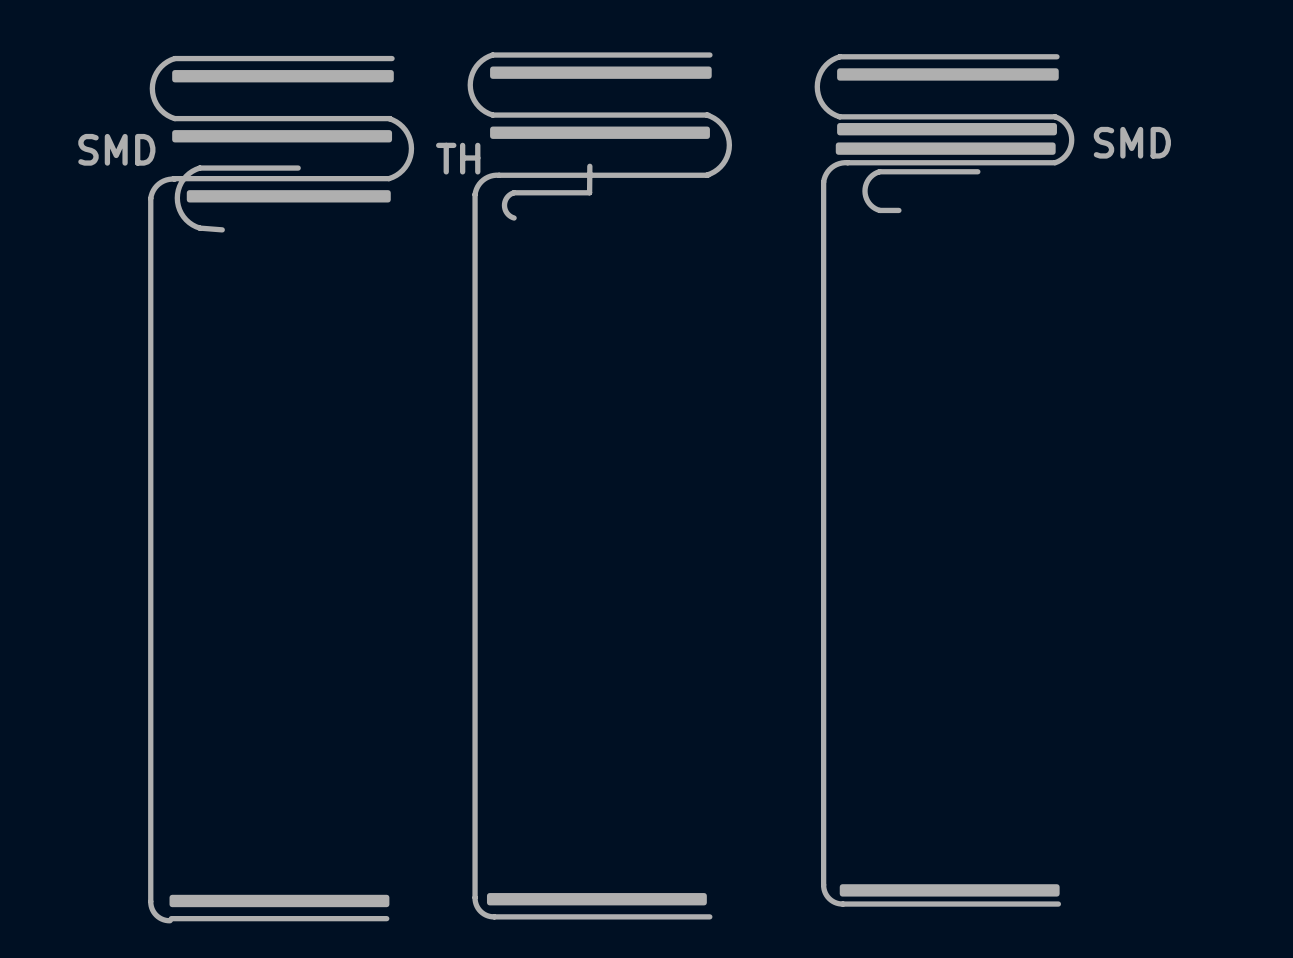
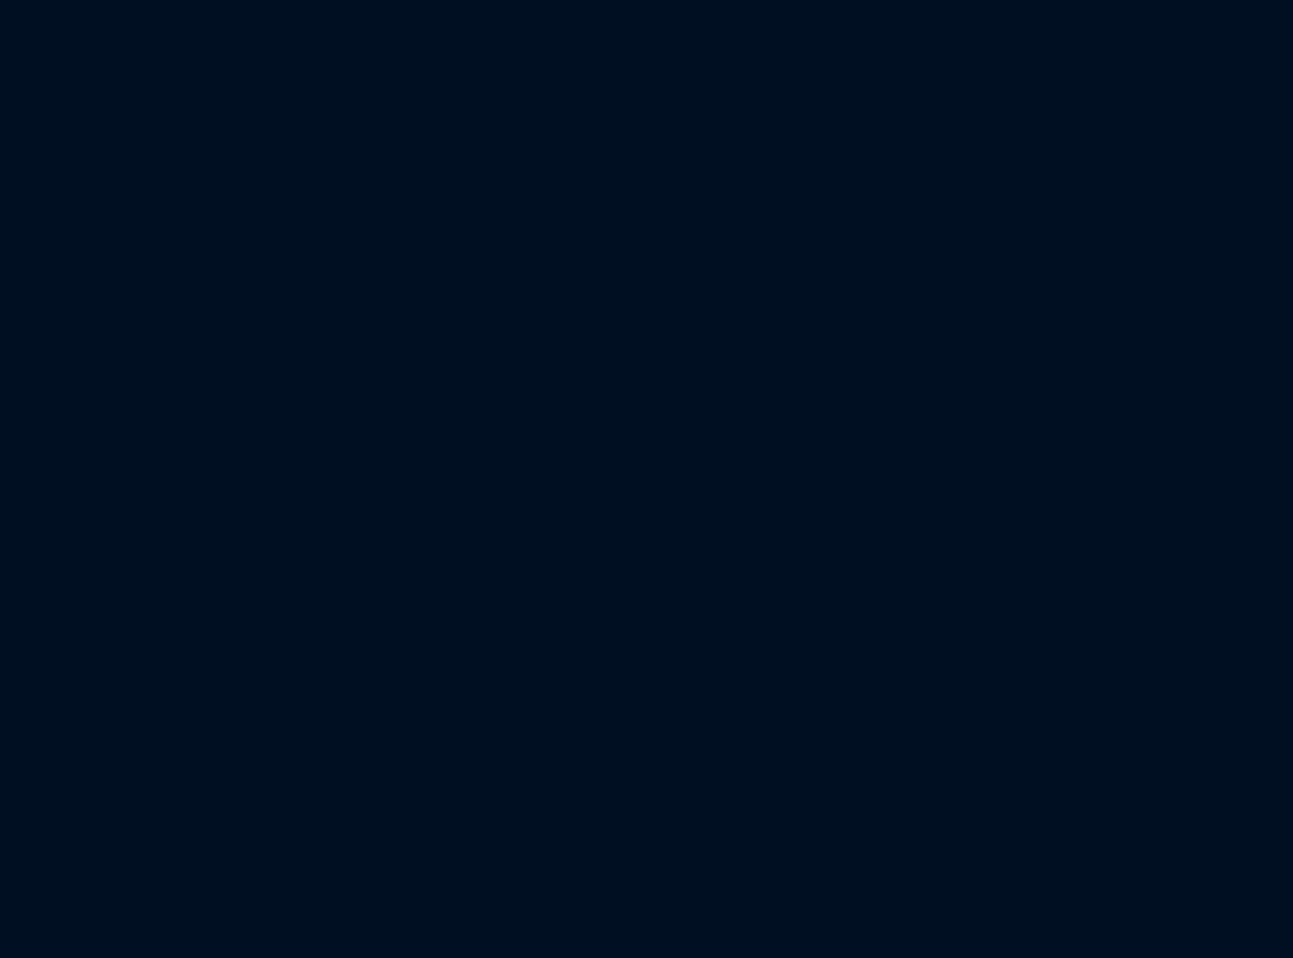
line: (709, 55) (492, 55) (485, 58) (476, 66) (471, 77) (470, 85) (472, 96) (476, 103) (482, 109) (492, 115) (708, 115) -> none
line: (1056, 56) (839, 56) (832, 60) (823, 68) (819, 75) (817, 86) (819, 98) (823, 105) (829, 111) (839, 116) (1055, 116) (1067, 125) (1071, 139) (1067, 153) (1055, 162) -> none
line: (392, 58) (174, 58) (167, 61) (158, 69) (153, 80) (152, 88) (154, 100) (158, 107) (167, 115) (174, 118) (390, 118) -> none
drawing: [490, 66, 712, 79] -> none
drawing: [835, 68, 1059, 155] -> none
drawing: [172, 70, 394, 83] -> none
line: (706, 115) (714, 118) (723, 126) (728, 137) (729, 145) (727, 156) (723, 163) (717, 169) (706, 175) -> none
line: (389, 118) (399, 124) (405, 129) (409, 136) (411, 148) (409, 160) (405, 167) (396, 175) (389, 178) (173, 178) -> none
drawing: [490, 126, 710, 139] -> none
drawing: [172, 130, 393, 143] -> none
text: SMD (1132, 142) -> none
text: SMD (116, 149) -> none
text: TH (458, 158) -> none
line: (1054, 162) (844, 162) (831, 167) (824, 179) (823, 884) (829, 898) (840, 903) (1058, 904) -> none
line: (589, 166) (589, 192) (513, 192) (507, 197) (504, 205) (507, 213) (514, 218) -> none
line: (298, 168) (199, 168) (189, 173) (183, 179) (178, 190) (177, 202) (181, 213) (189, 222) (196, 226) (222, 229) -> none
line: (977, 171) (879, 171) (872, 175) (865, 188) (869, 203) (879, 210) (898, 210) -> none
line: (708, 175) (496, 175) (483, 180) (475, 191) (475, 897) -> none
line: (174, 179) (166, 180) (158, 183) (153, 190) (150, 198) (150, 901) -> none
drawing: [186, 190, 391, 203] -> none
drawing: [839, 884, 1060, 897] -> none
drawing: [486, 893, 707, 906] -> none
drawing: [169, 894, 390, 908] -> none
line: (475, 897) (479, 909) (492, 916) (709, 916) -> none
line: (150, 901) (156, 915) (170, 920) -> none
line: (171, 918) (386, 918) -> none

